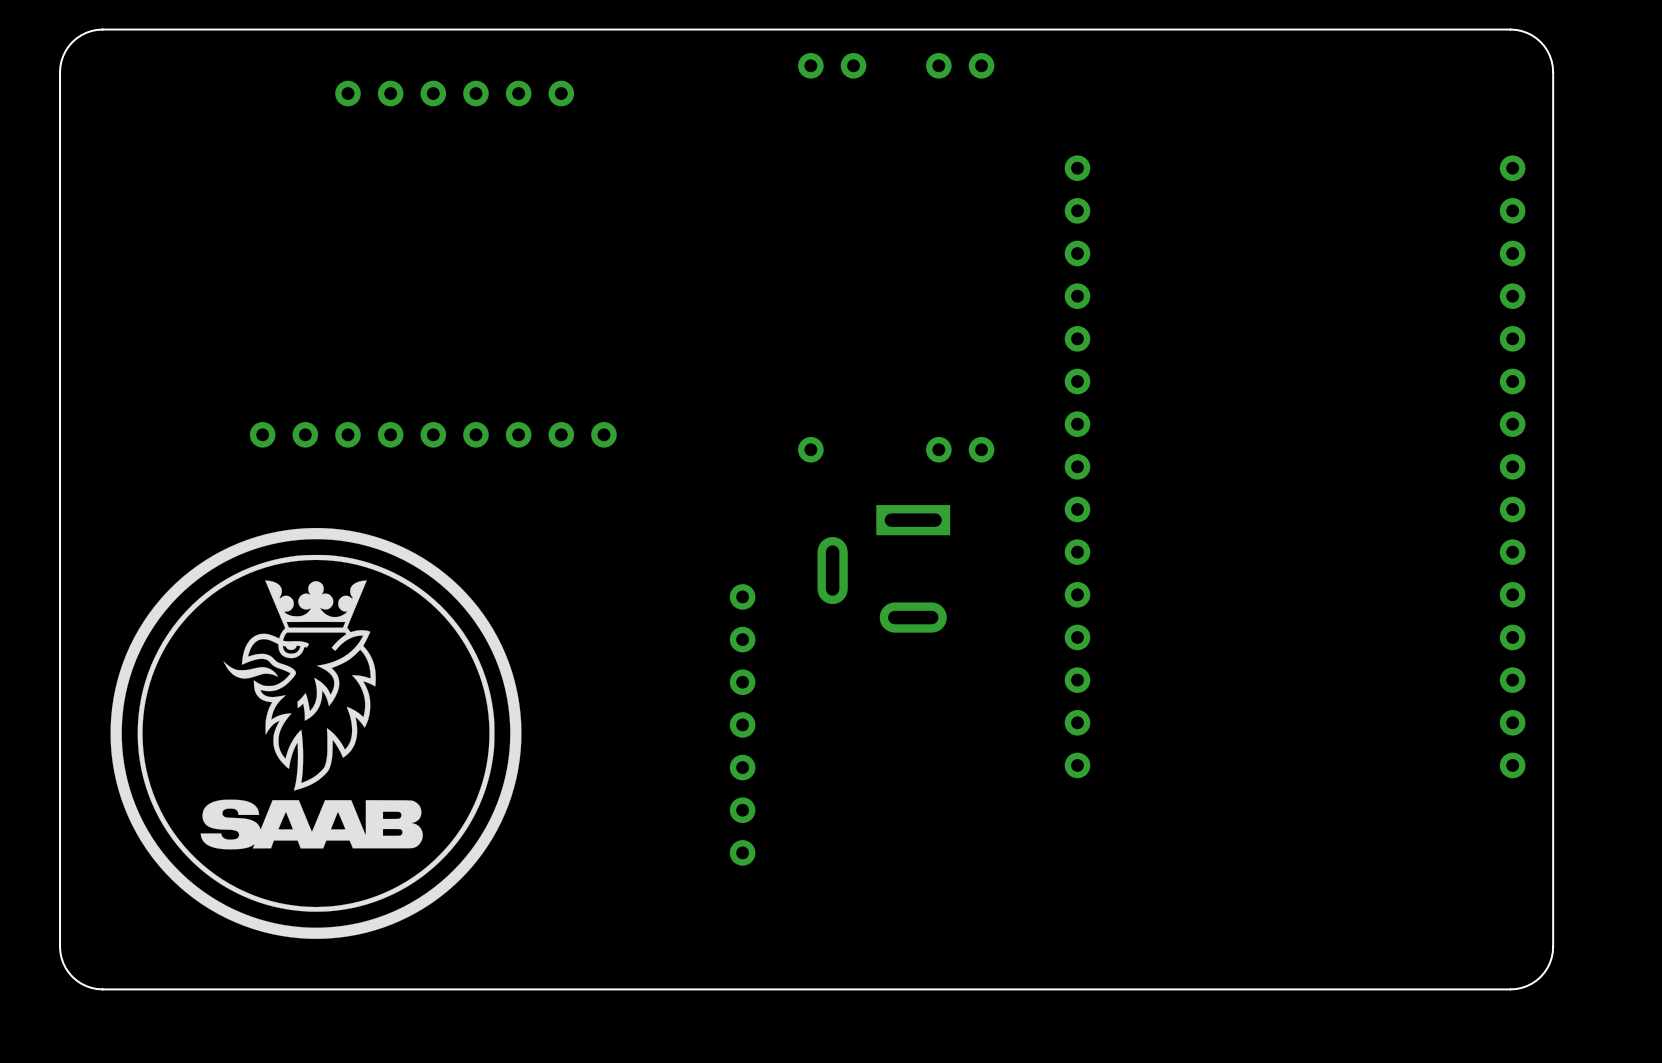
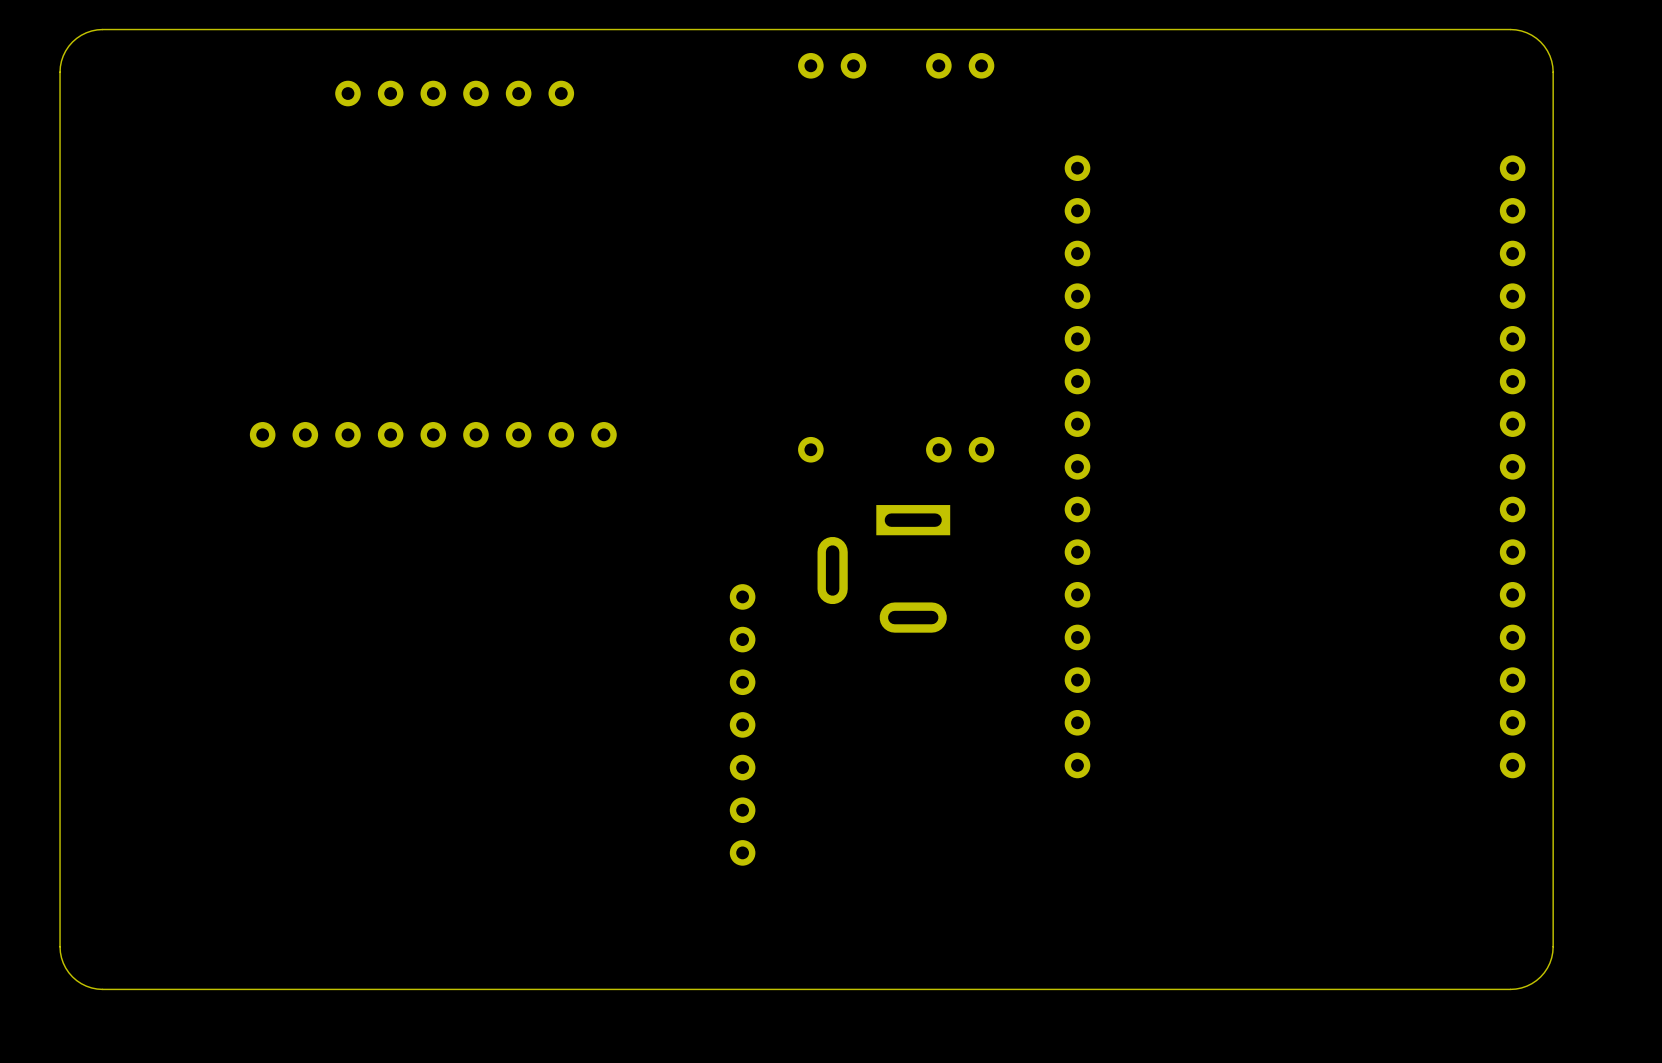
drawing: [110, 527, 522, 939] -> none

